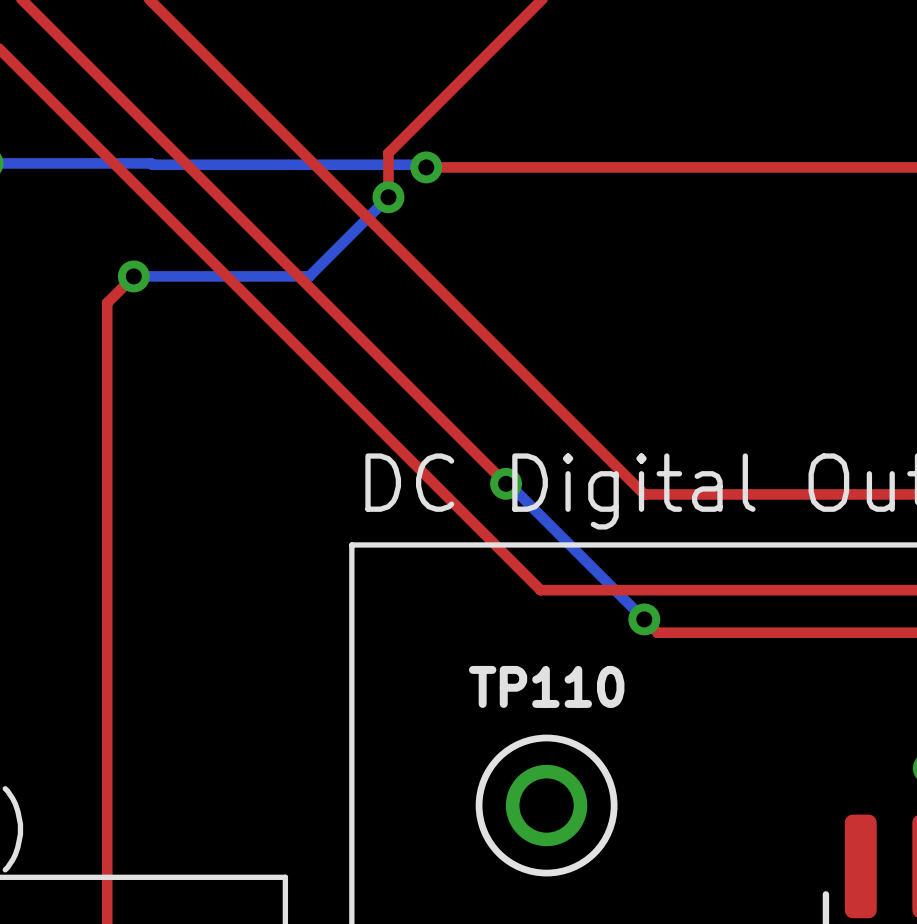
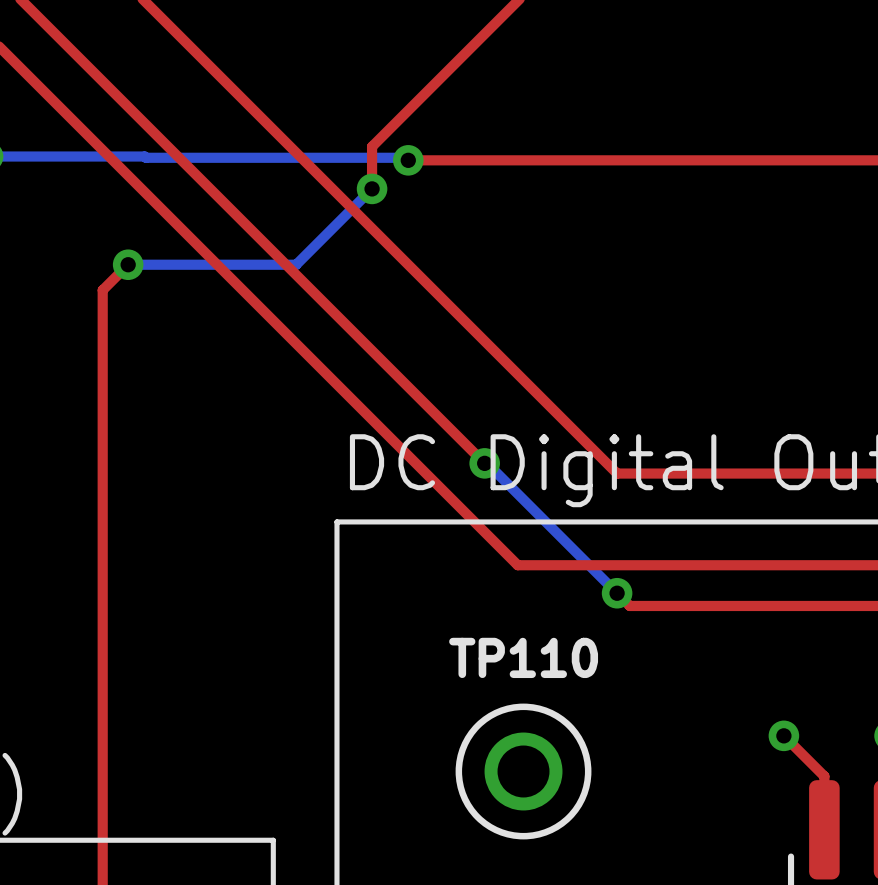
top track: none -> (783, 735) (824, 776) (824, 829)
via: none -> (783, 735)

